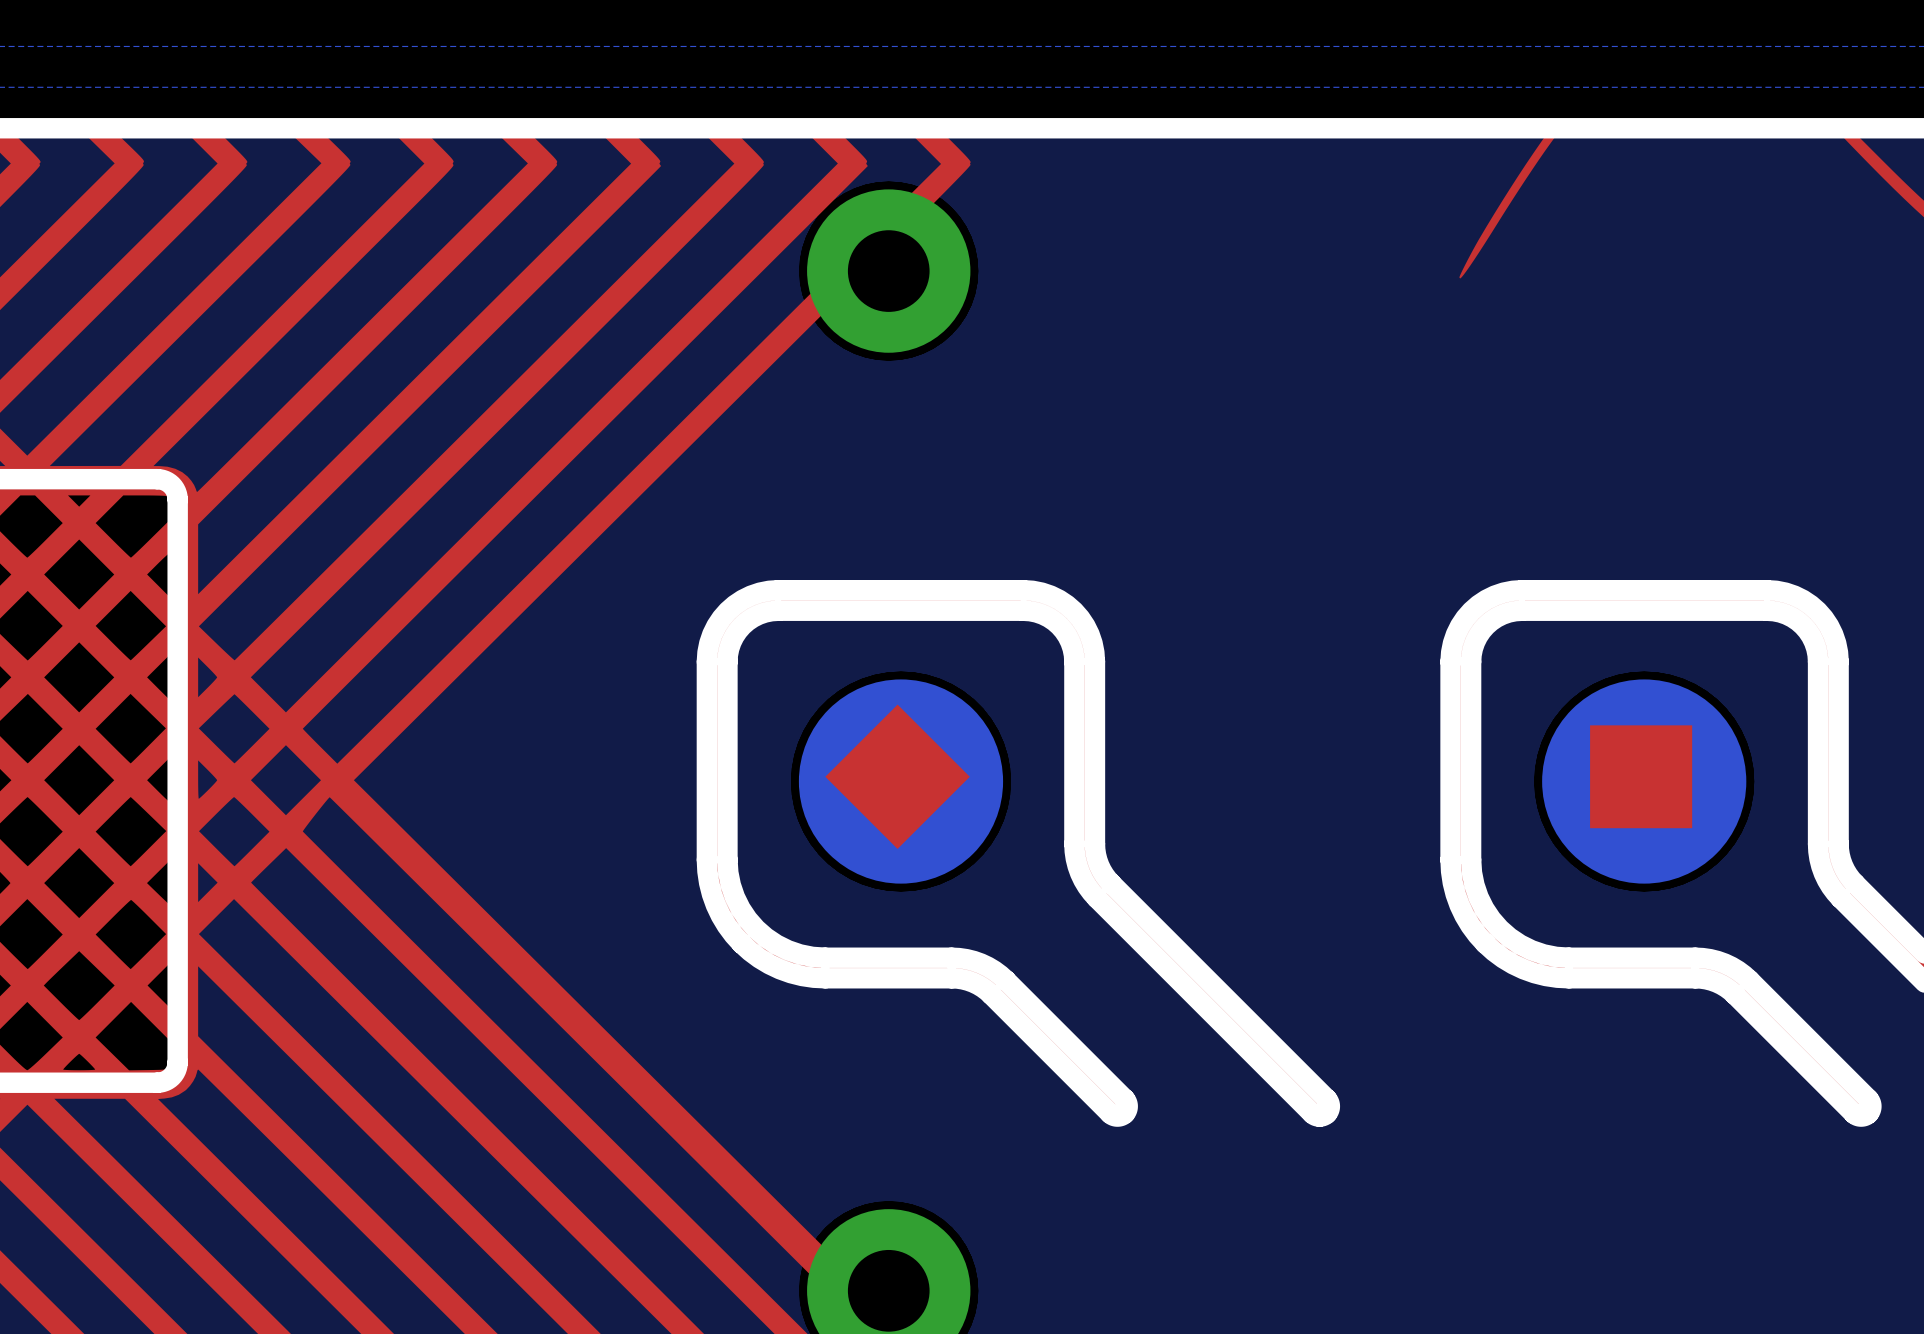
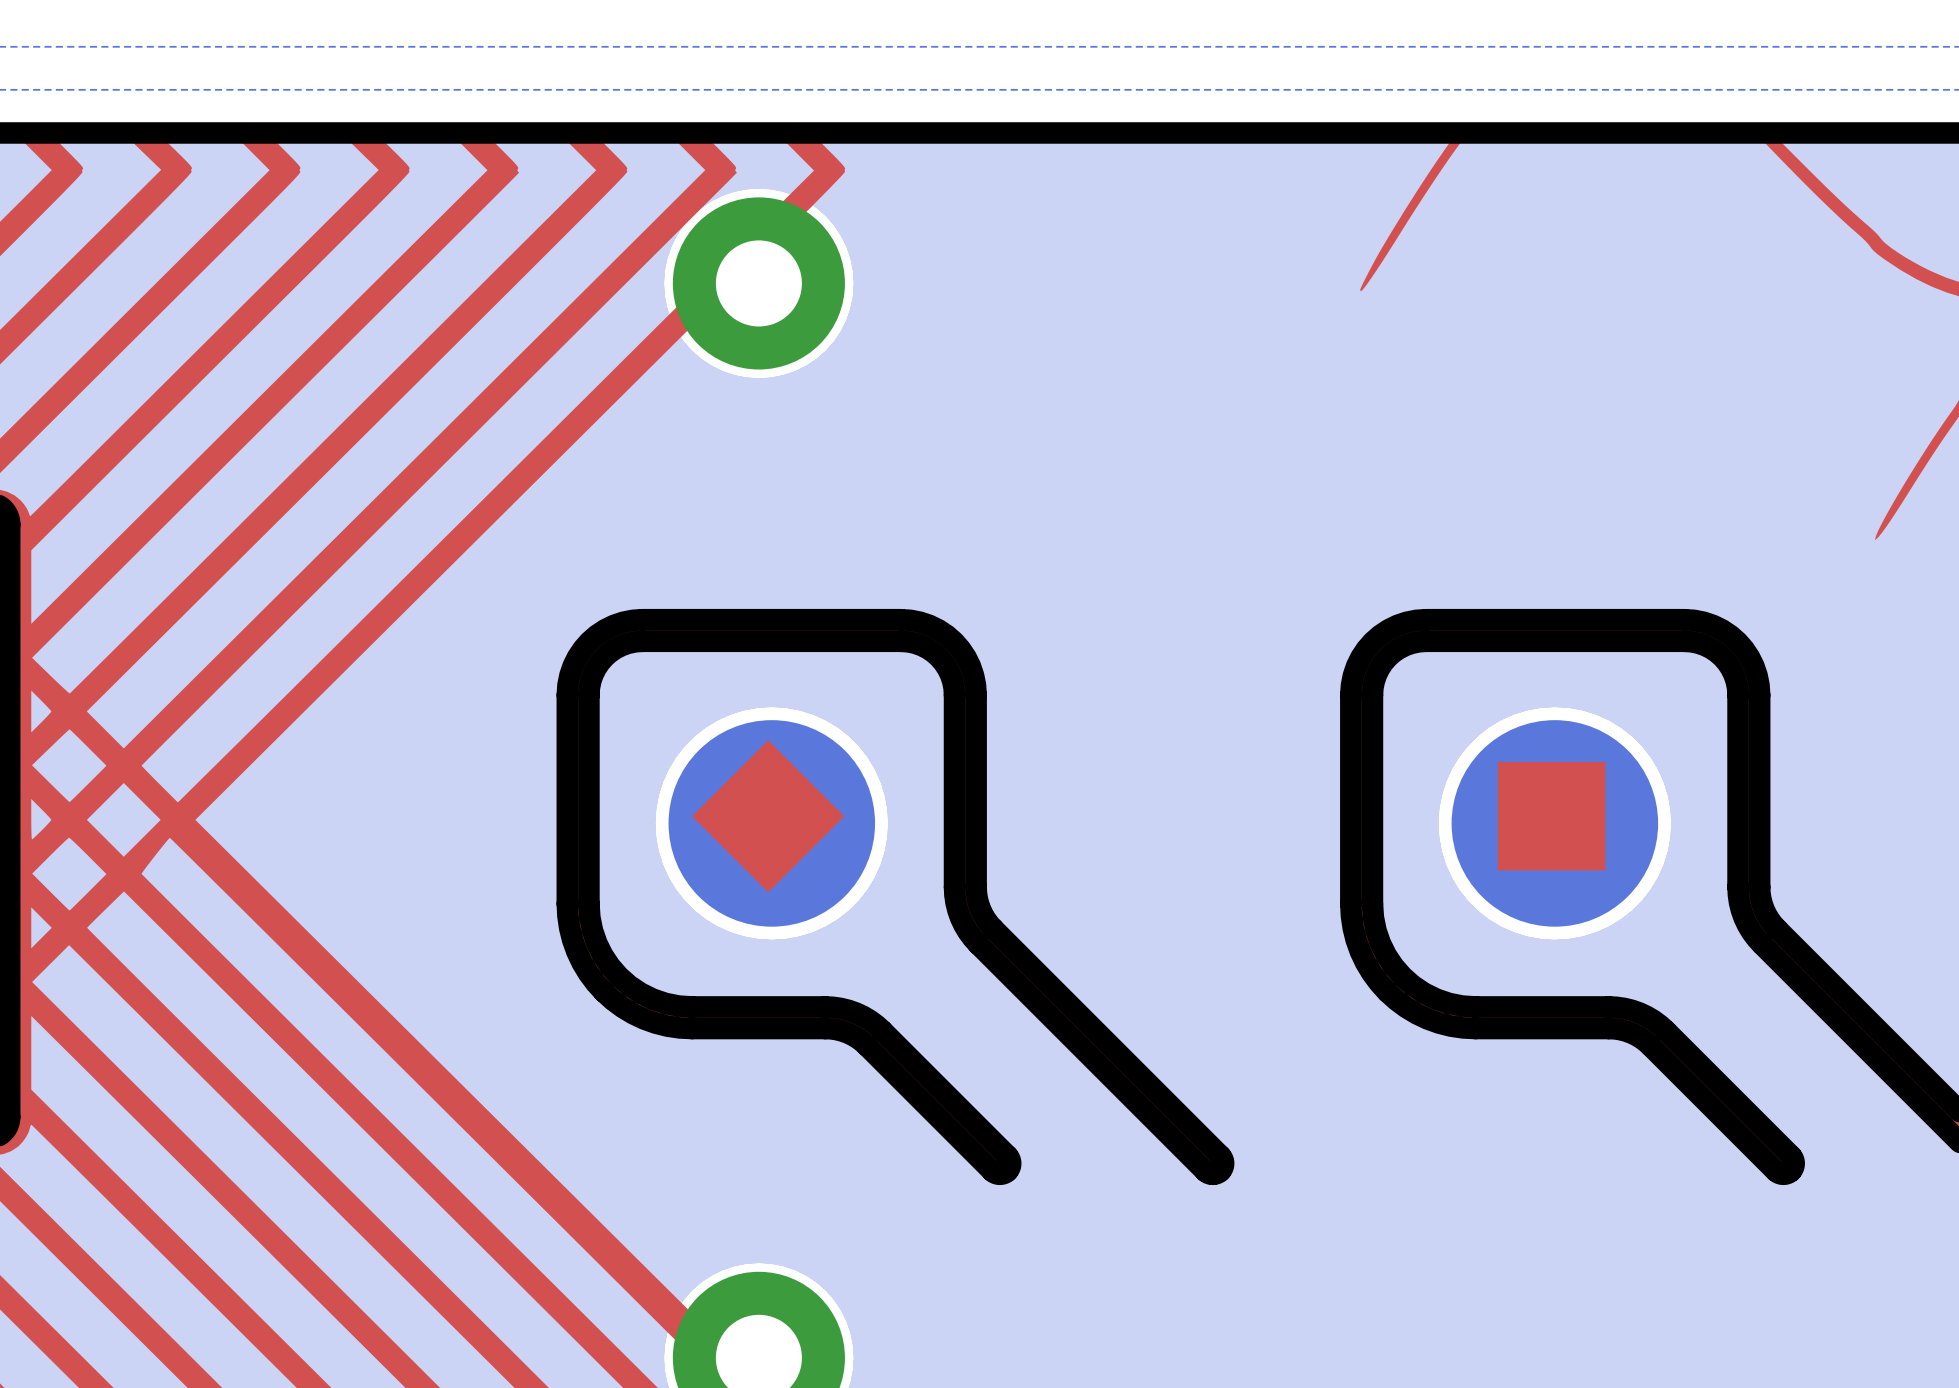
part footprint: [798, 679, 1004, 884] -> [668, 720, 876, 927]
part footprint: [1542, 679, 1747, 884] -> [1451, 720, 1659, 927]

